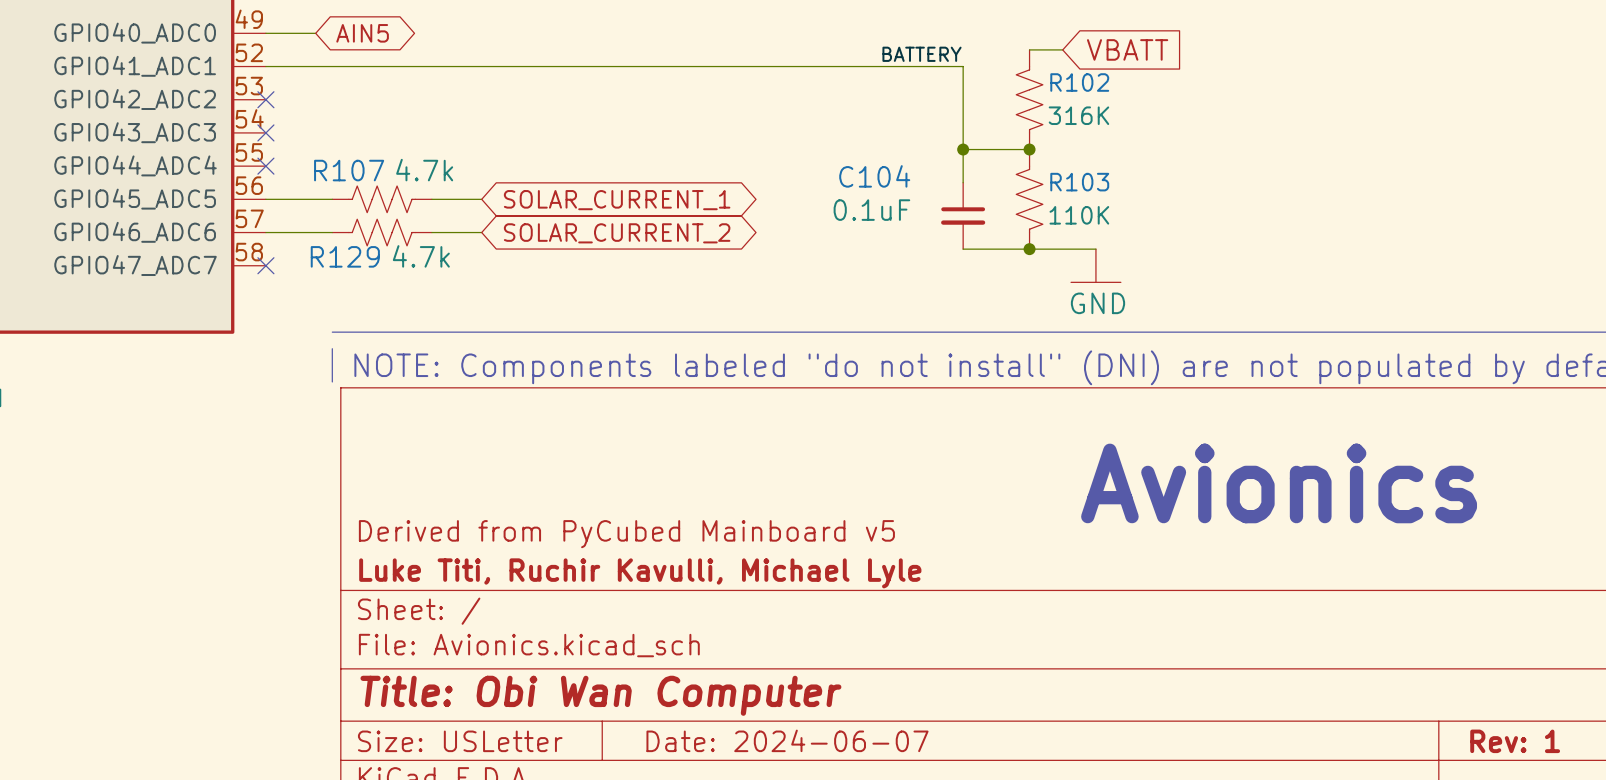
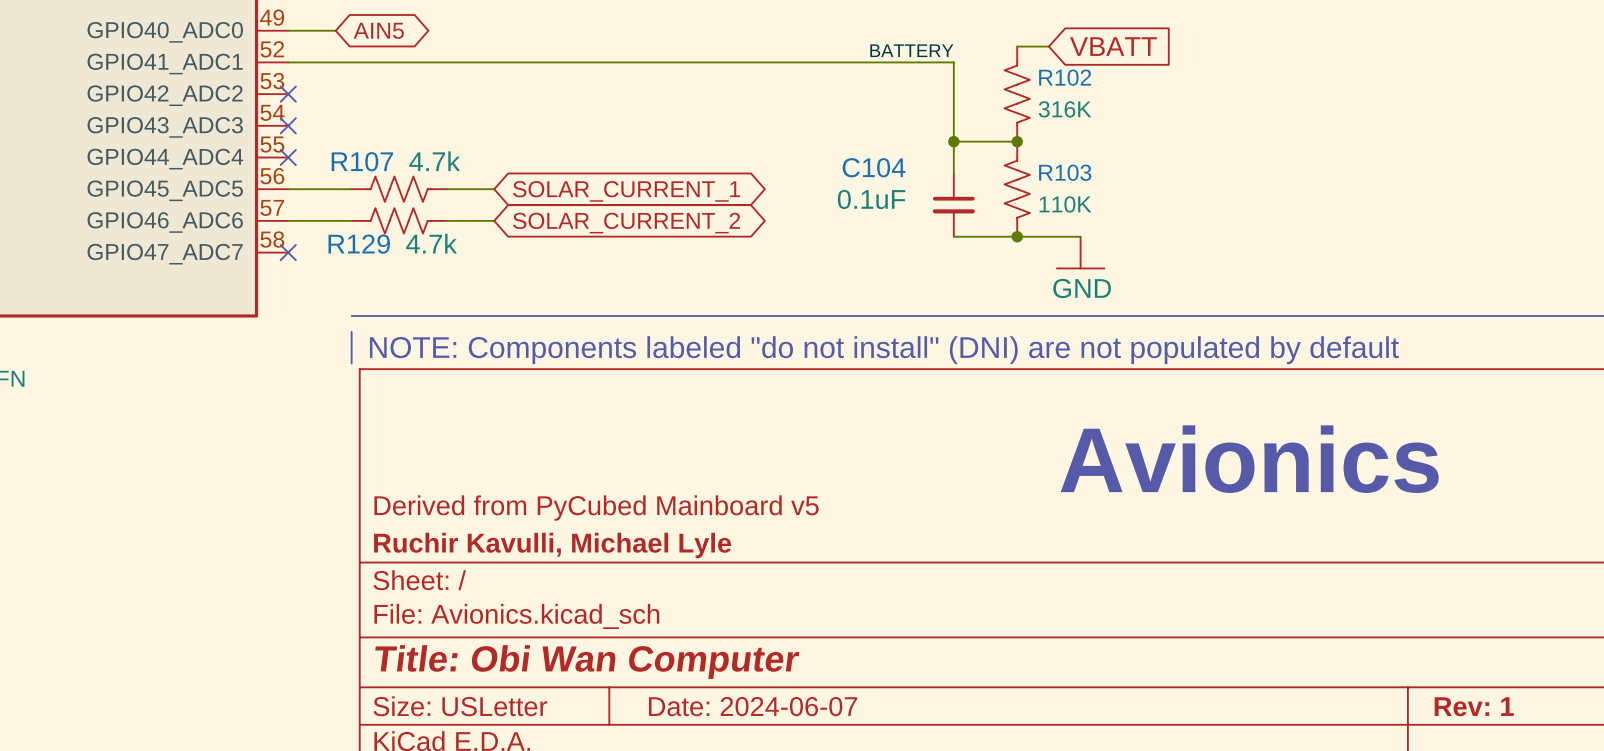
title block: Luke Titi, Ruchir Kavulli, Michael Lyle (640, 573) -> Ruchir Kavulli, Michael Lyle (552, 545)

